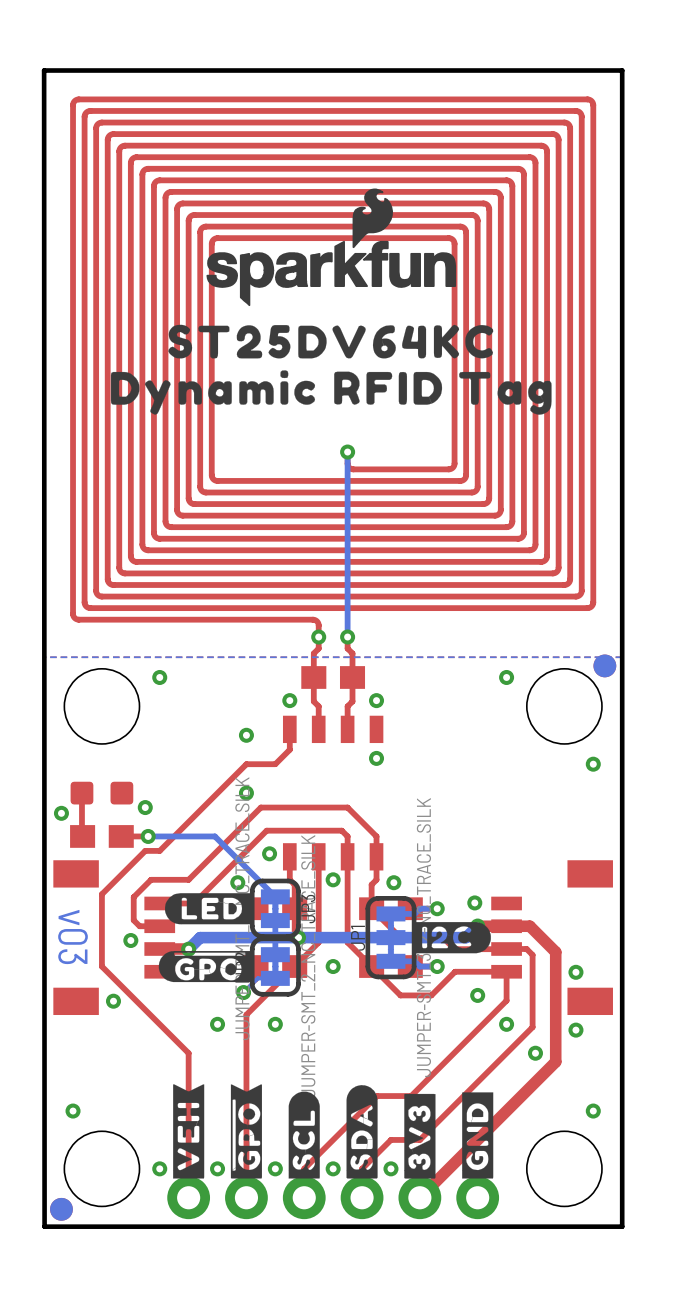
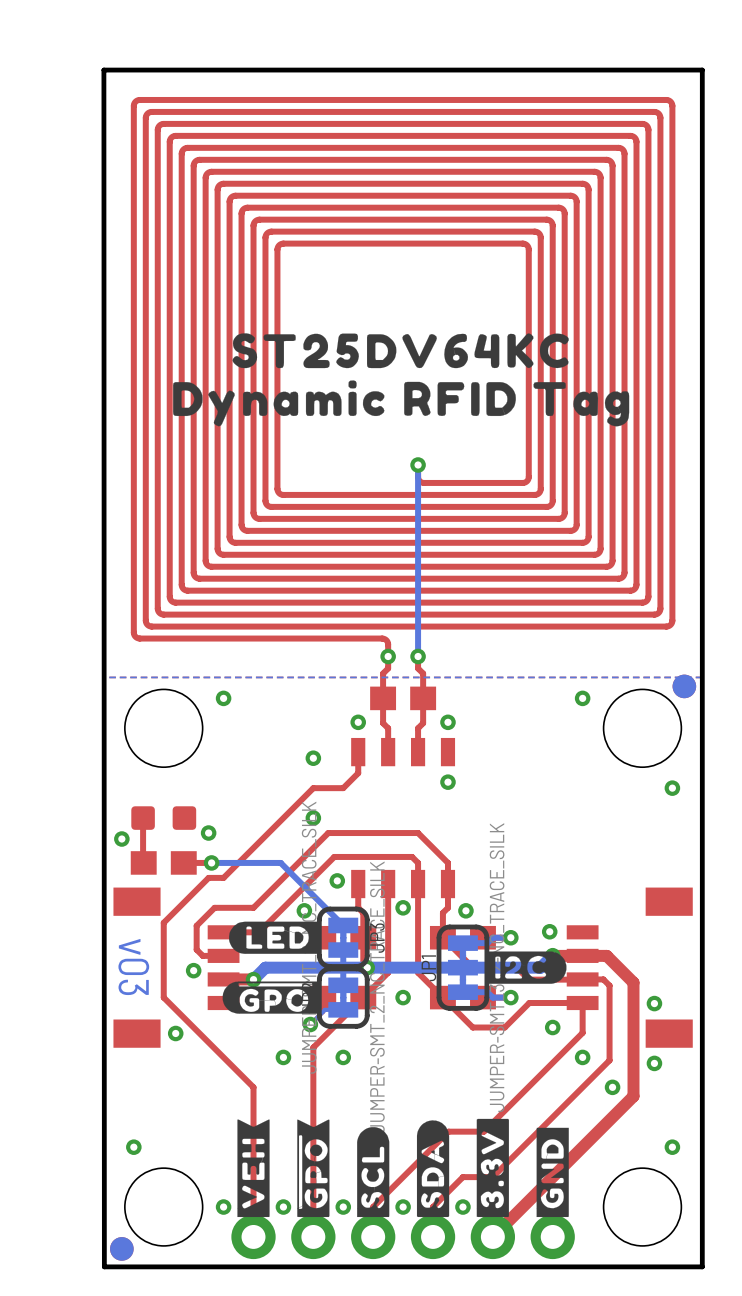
drawing: [206, 188, 457, 307] -> none
drawing shape: [404, 1093, 436, 1179] -> [476, 1118, 509, 1218]

